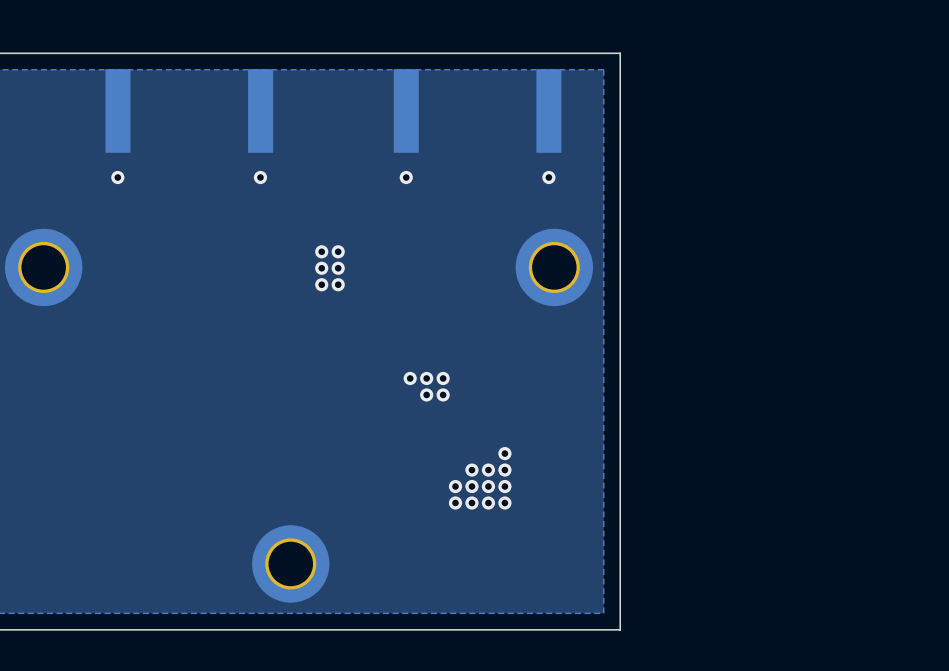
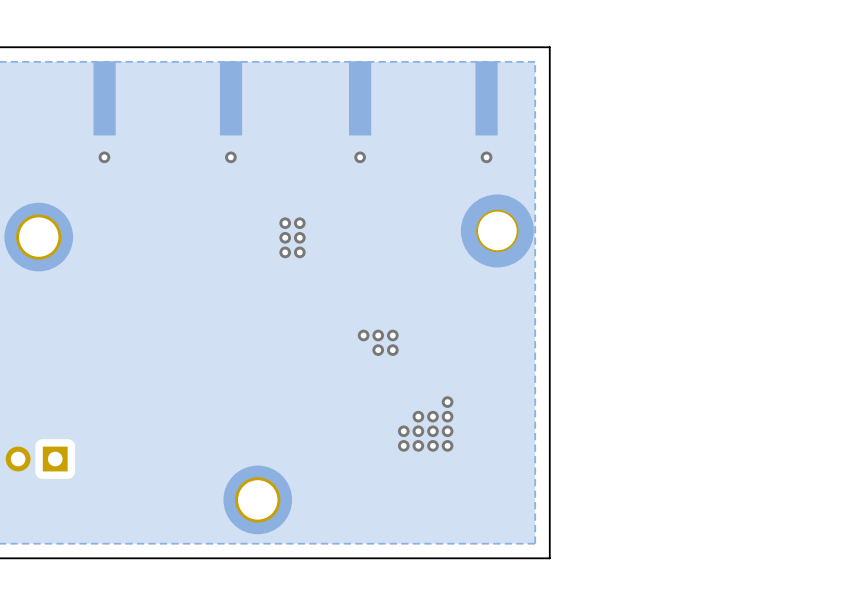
part footprint: [515, 228, 594, 307] -> [460, 194, 534, 268]
part: none -> (36, 459)

